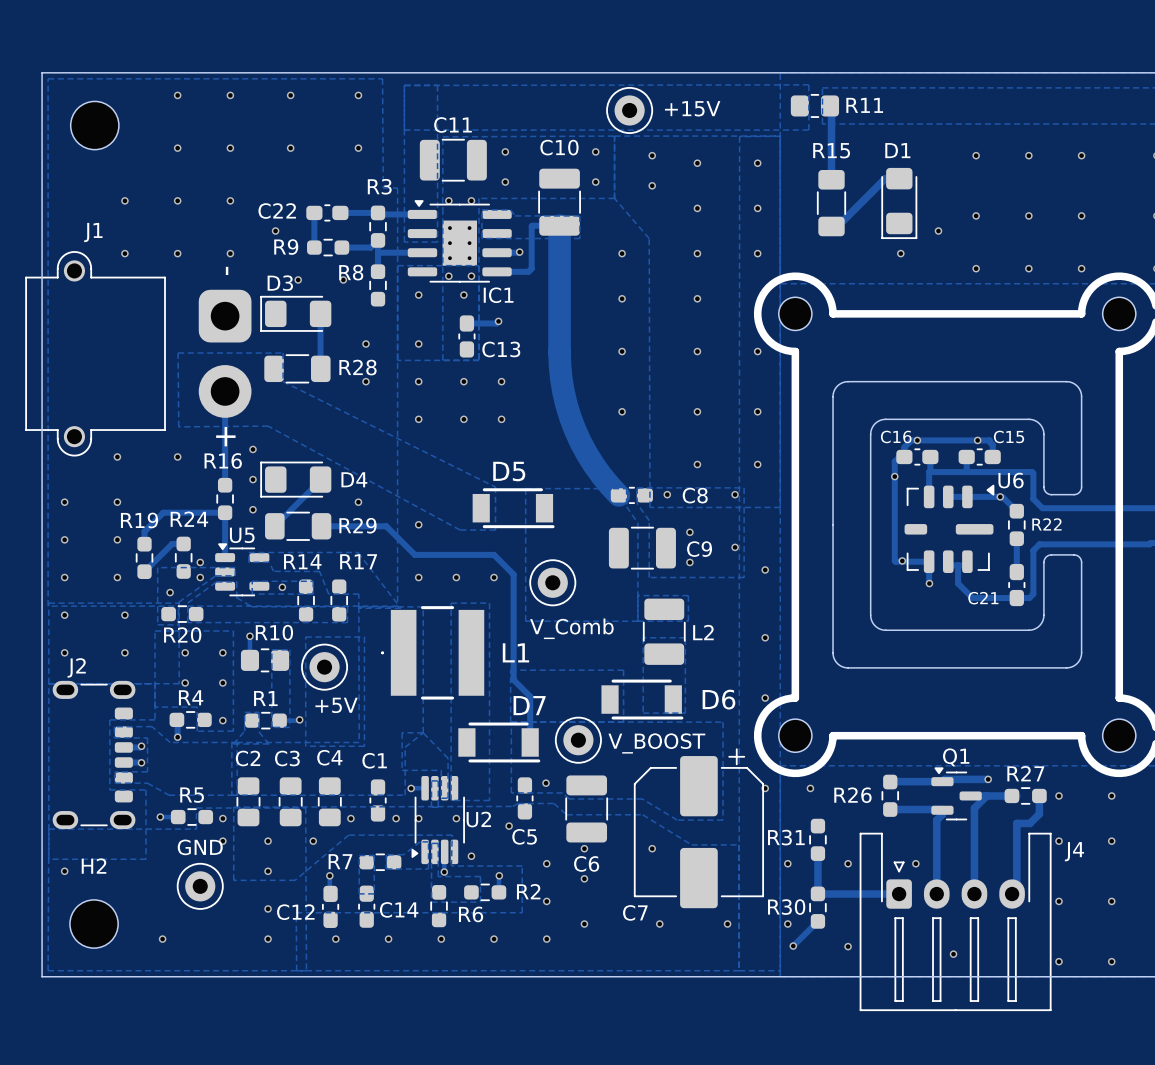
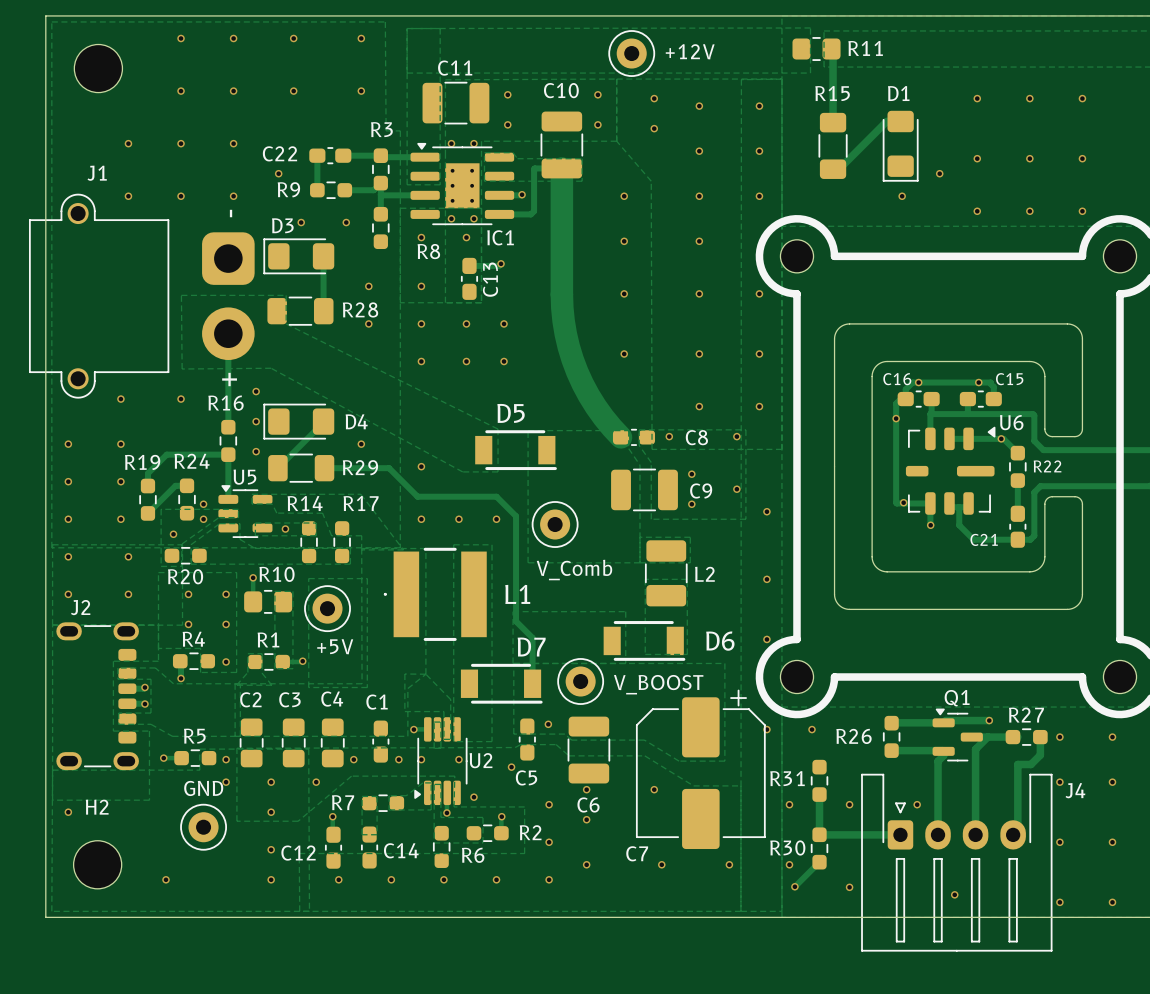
text: +15V (692, 108) -> +12V (690, 51)
R8 name position: R8 (351, 272) -> R8 (428, 251)
C13 name rotation: 0° (501, 349) -> 90° counterclockwise (490, 279)

